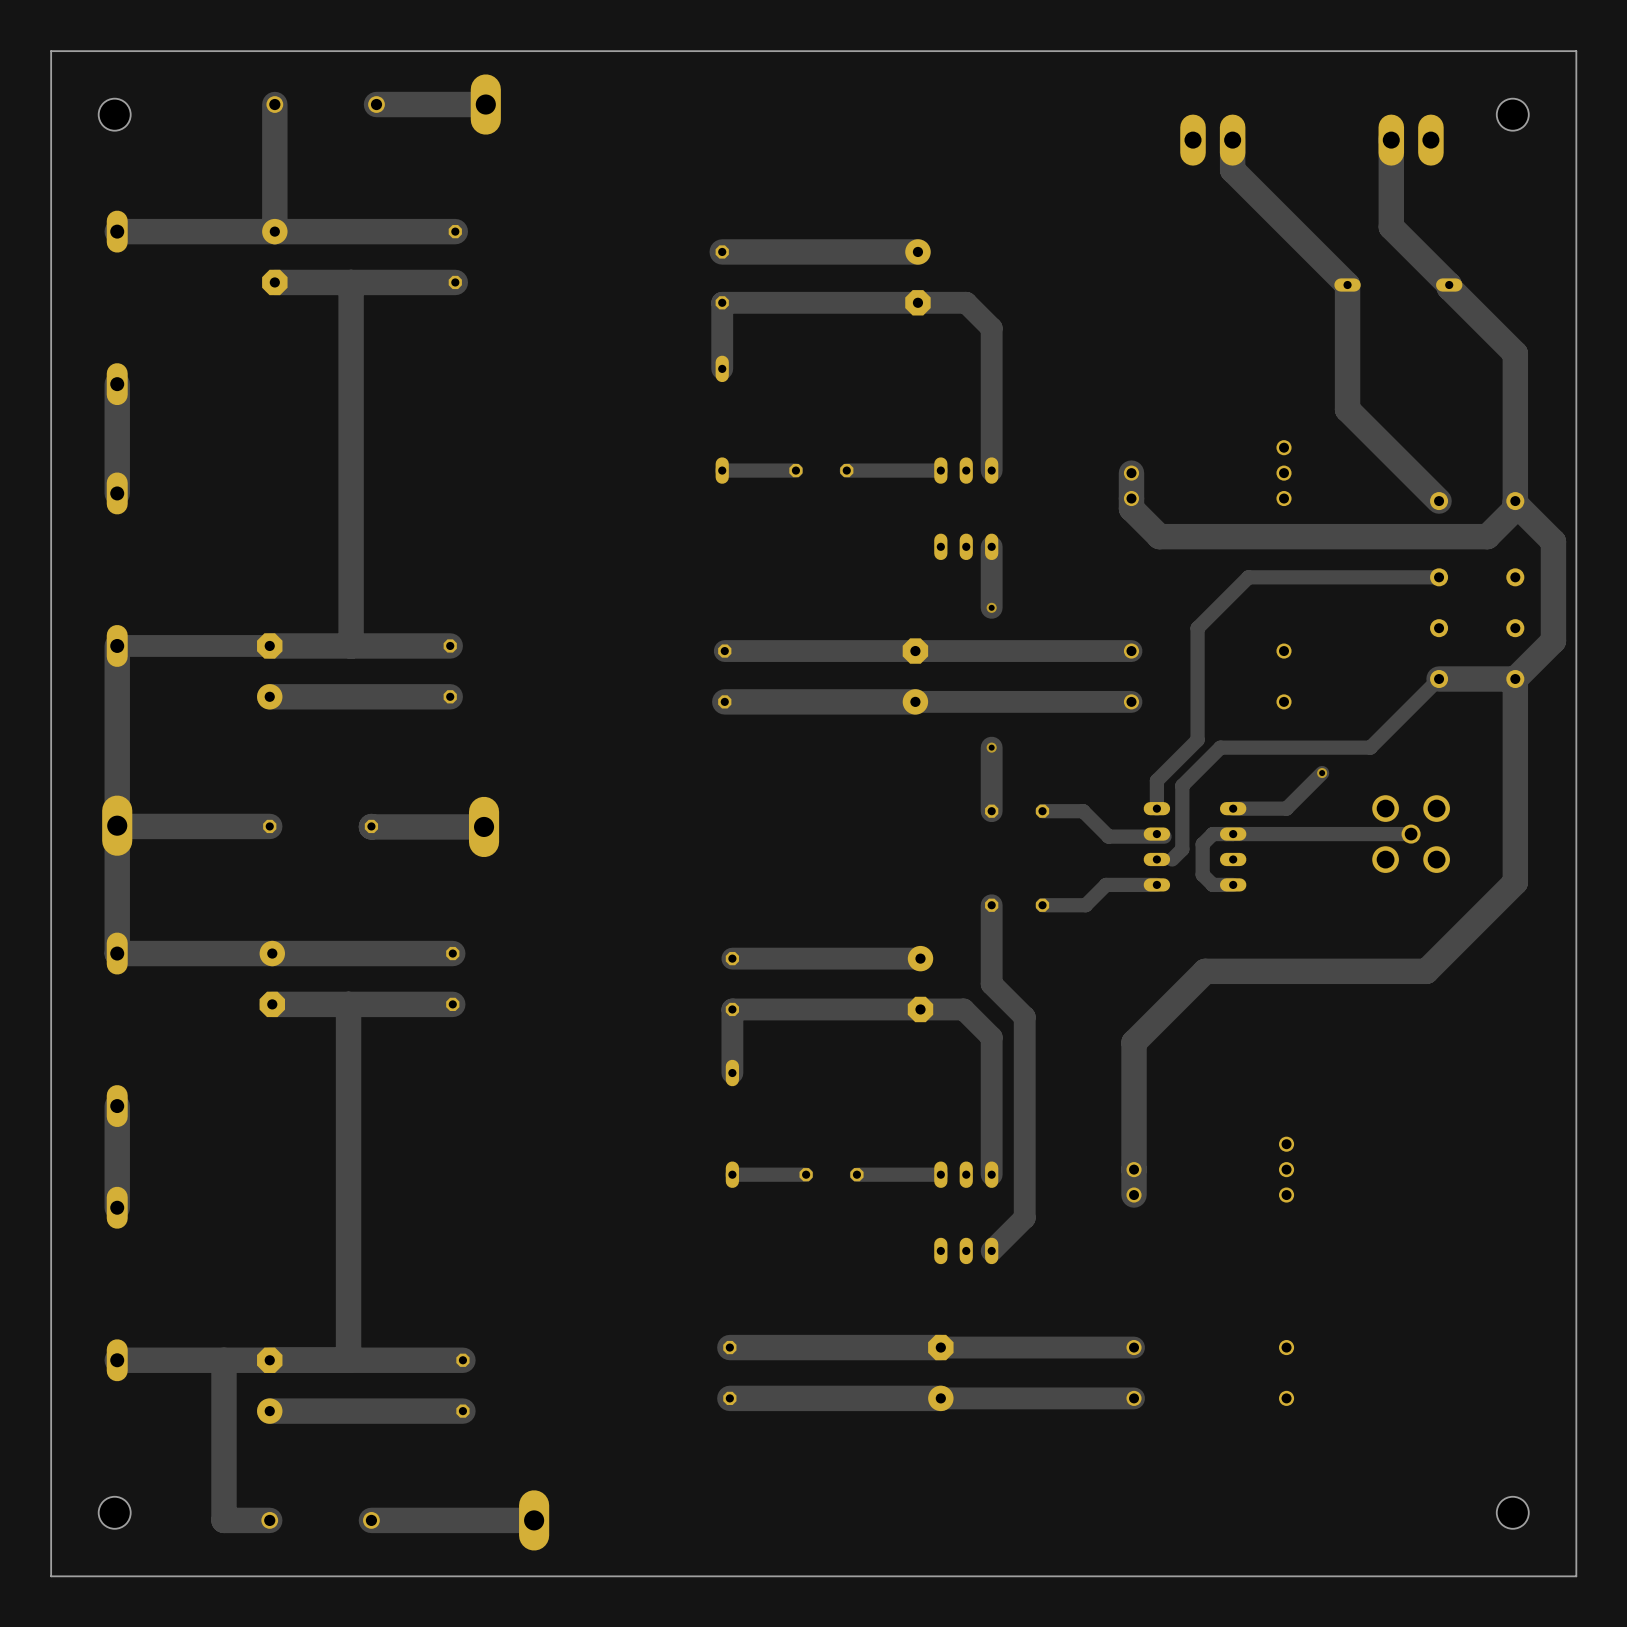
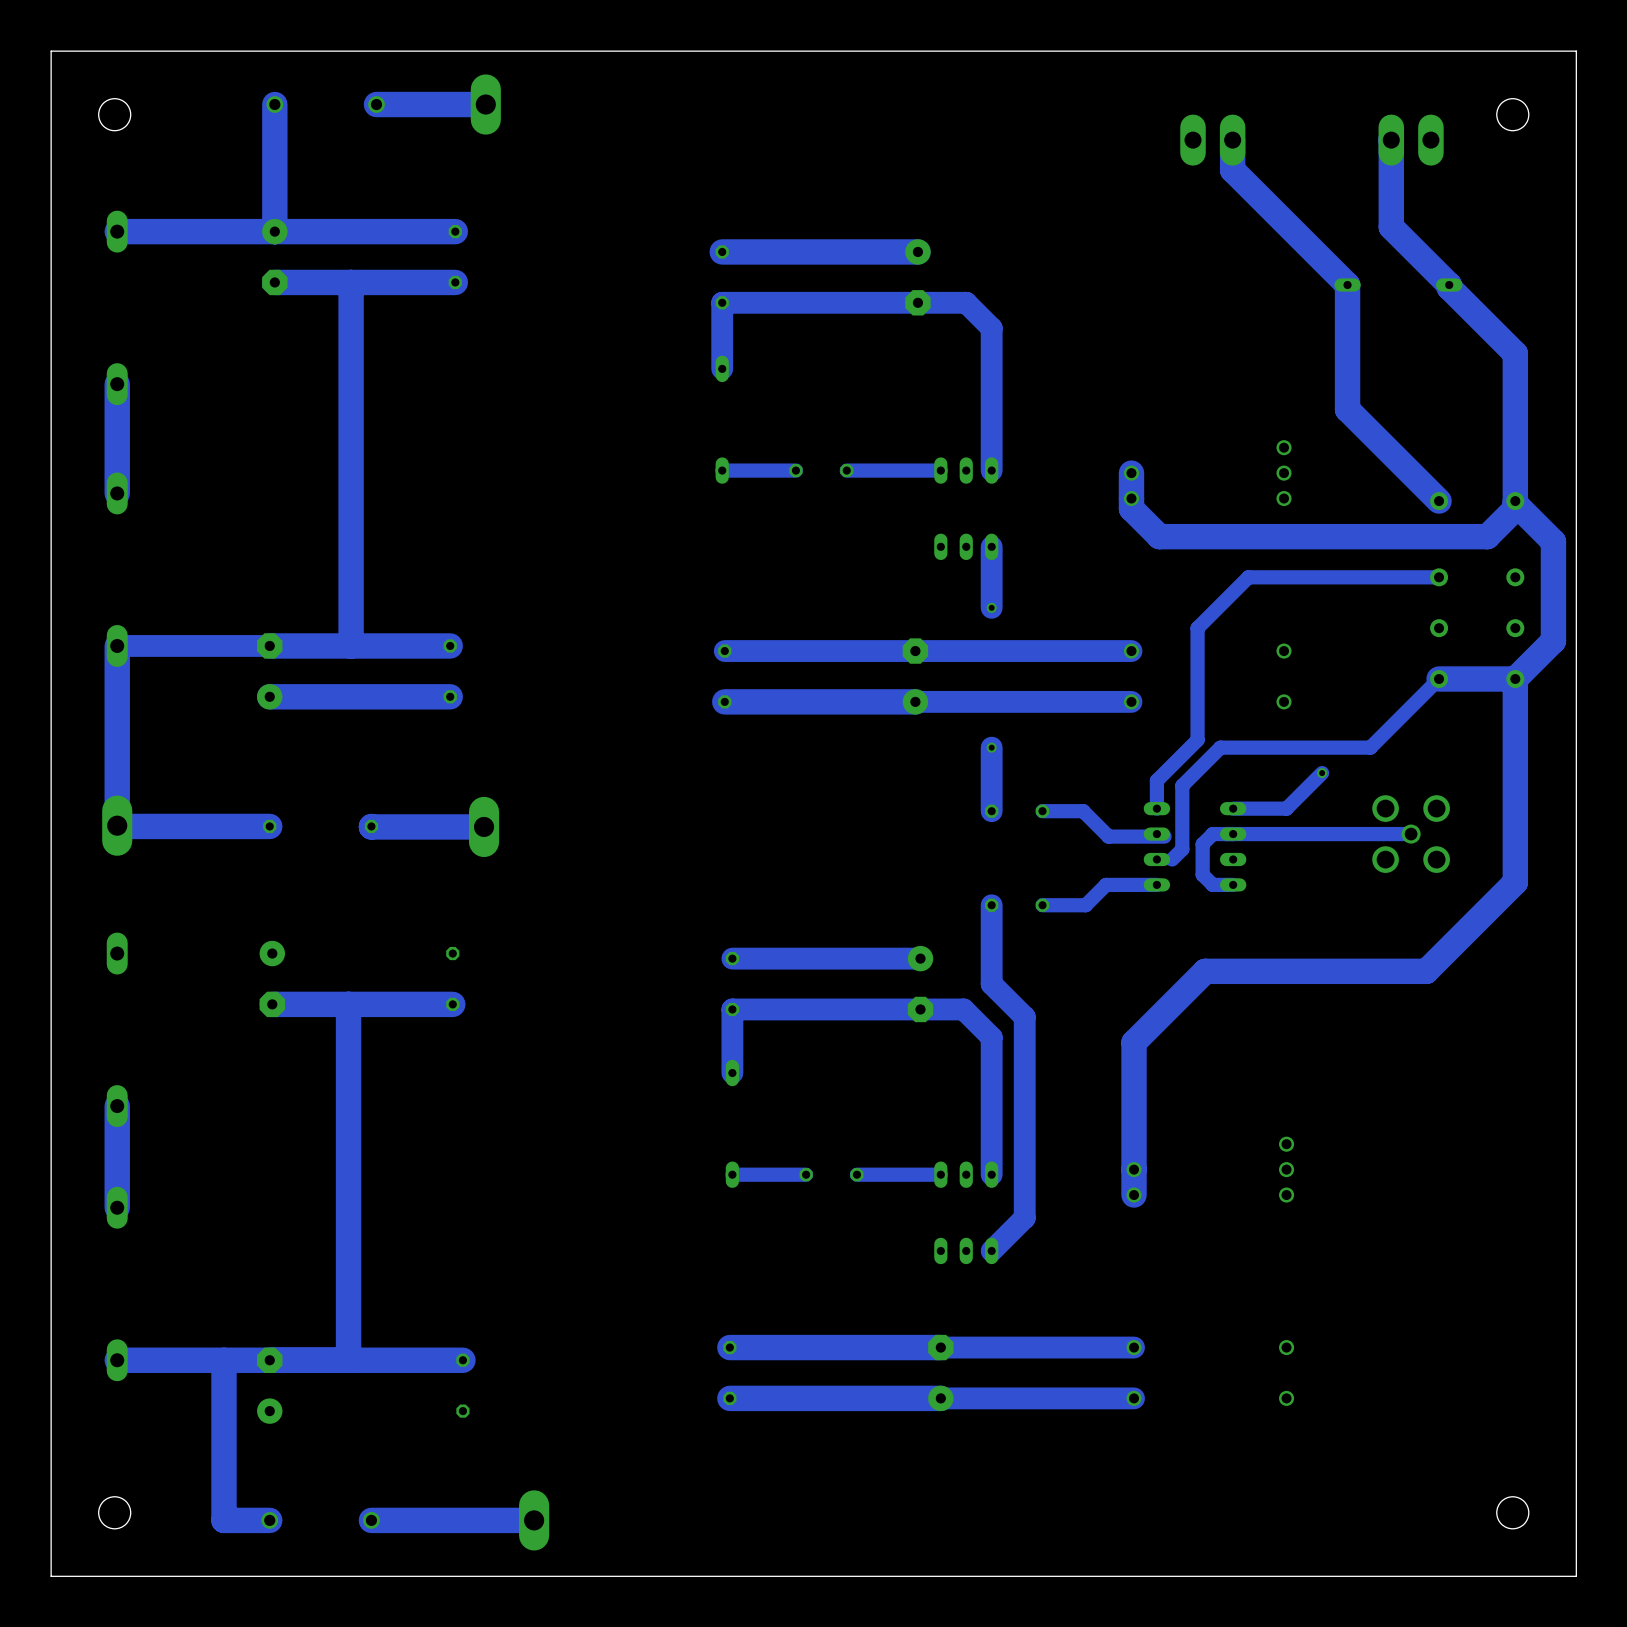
track: (117, 826) (117, 953) (452, 953) -> none
track: (462, 1411) (269, 1411) -> none

